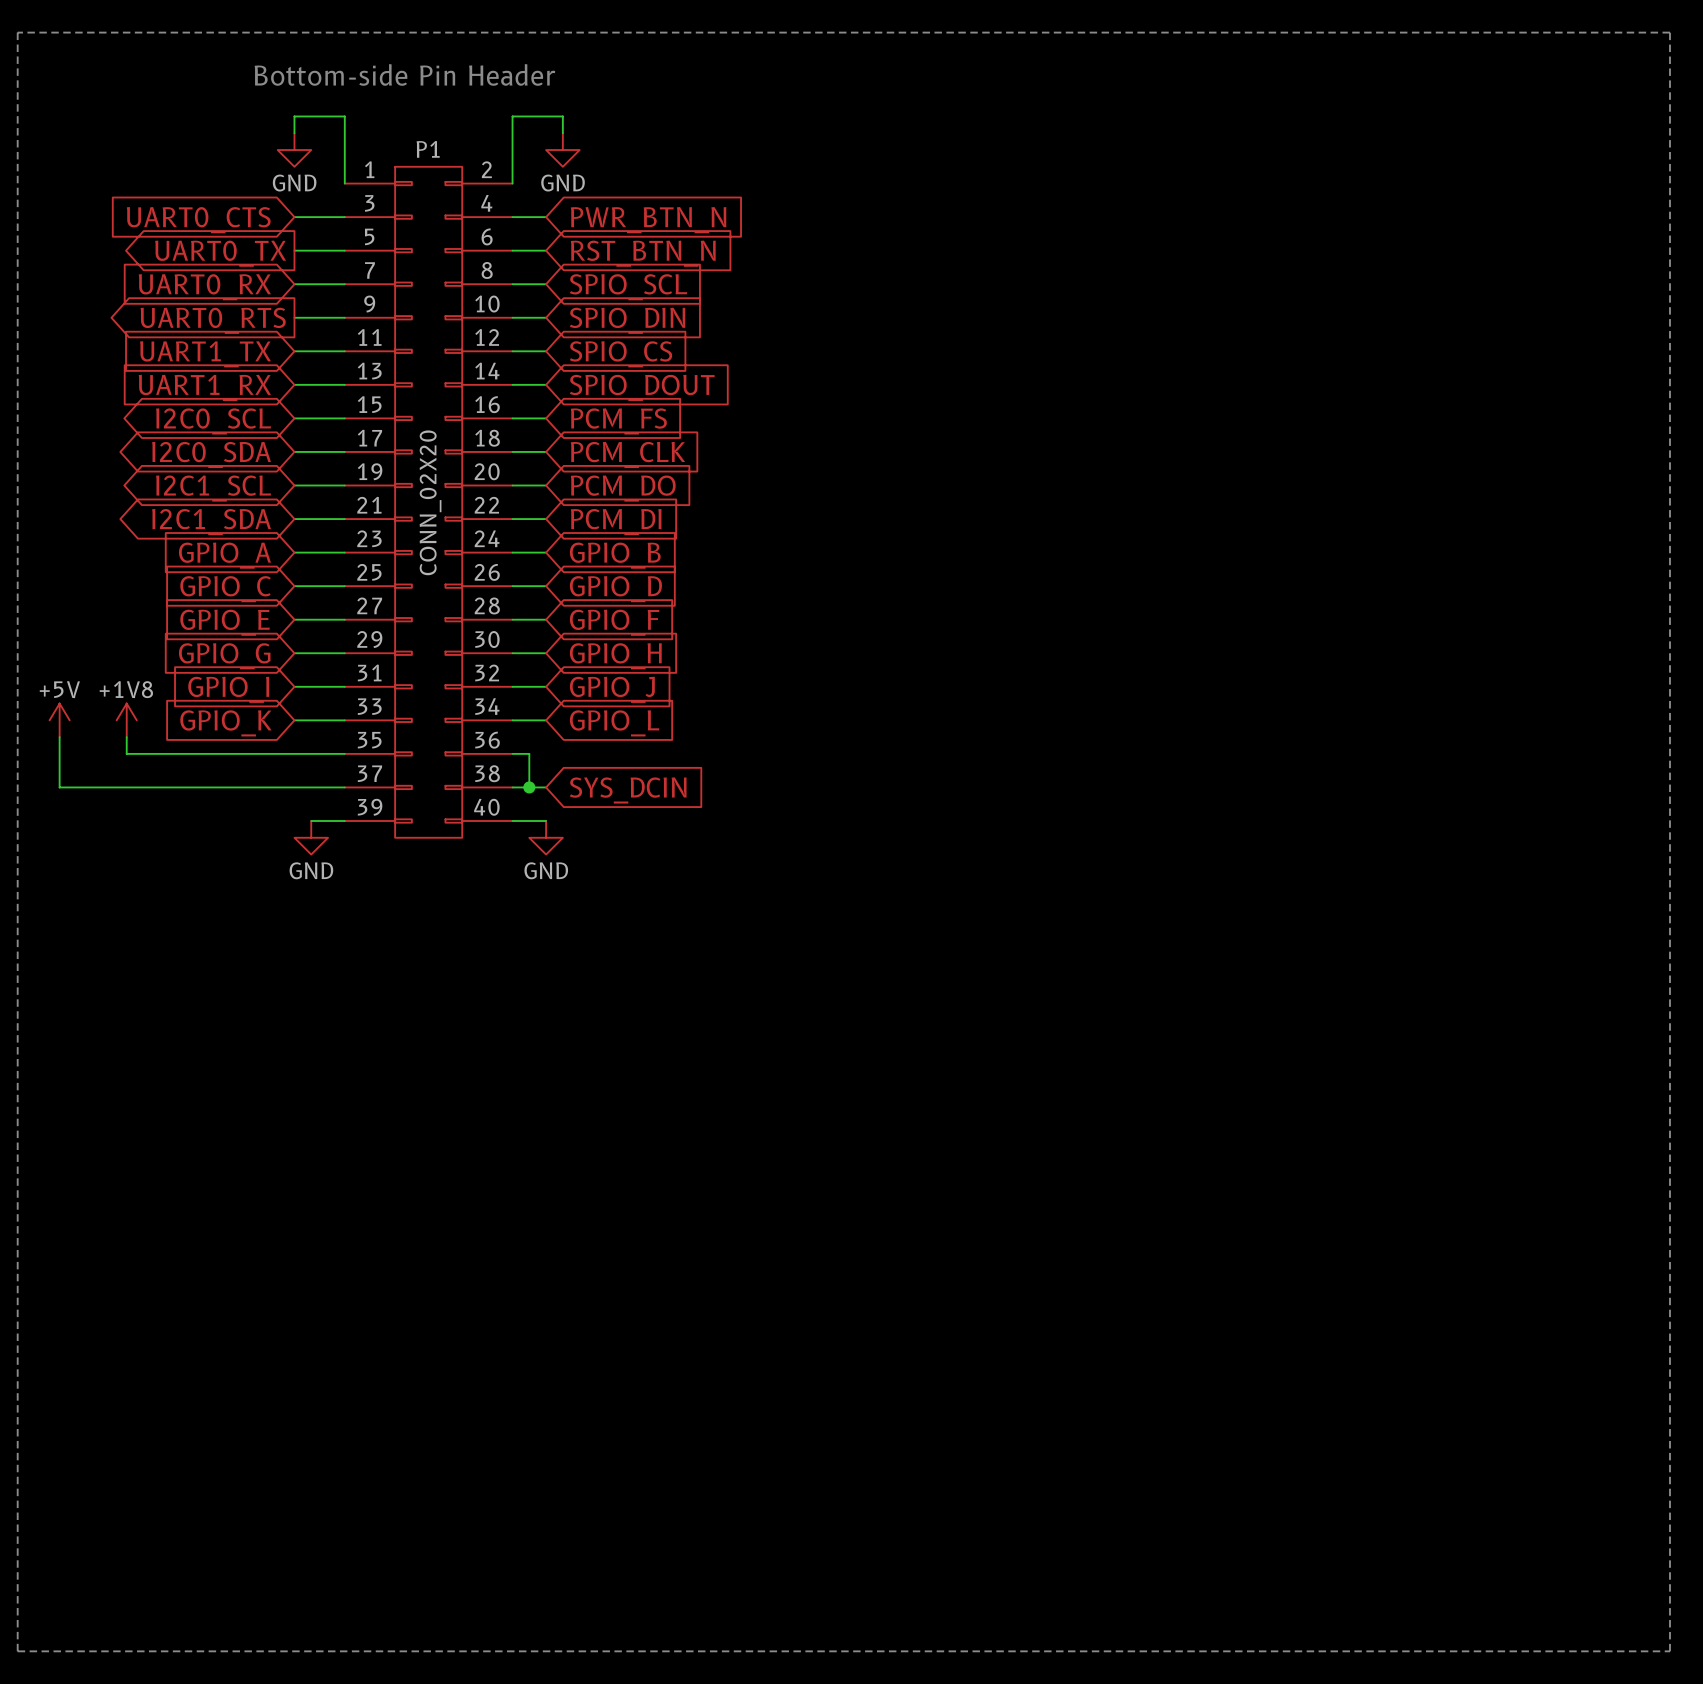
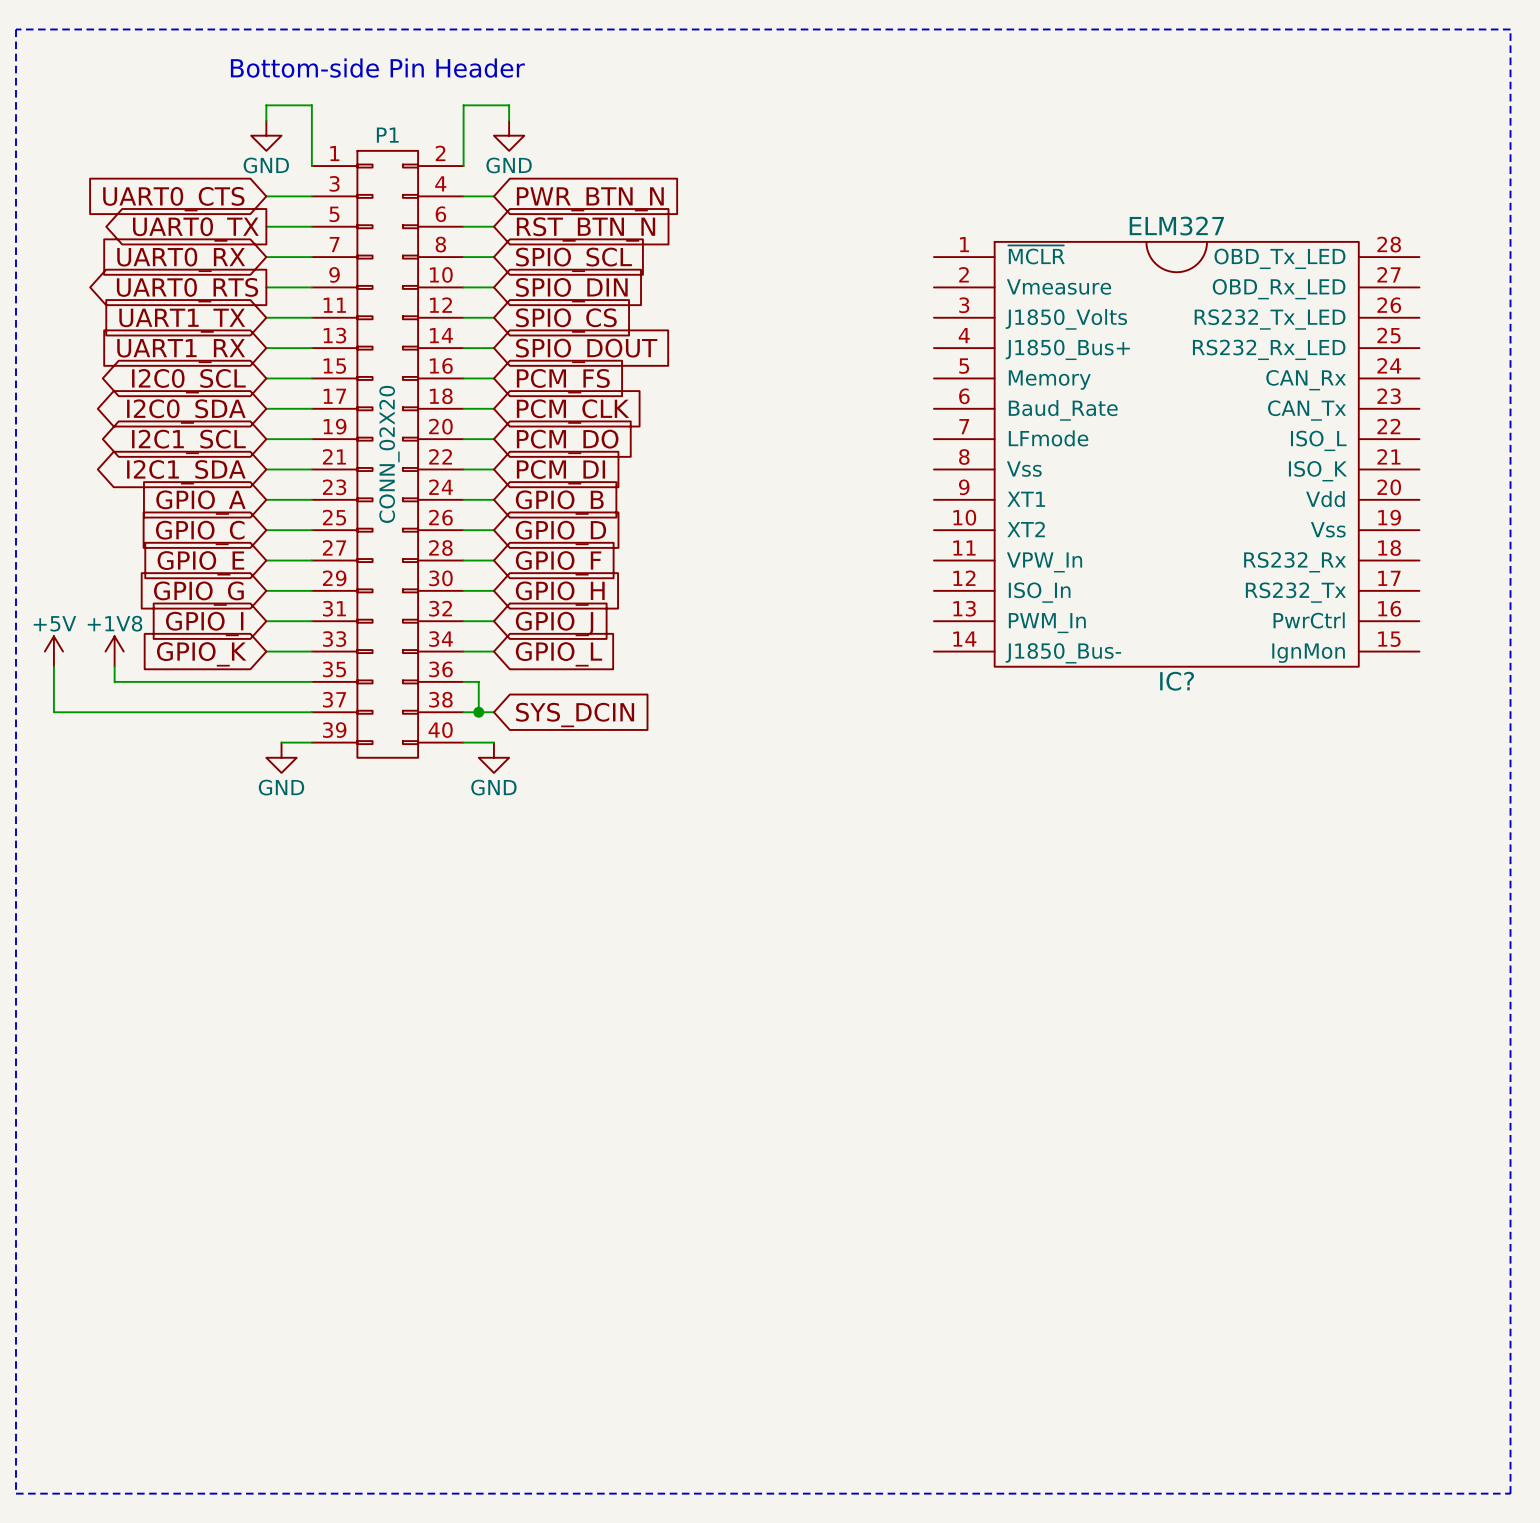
IC?: none -> ELM327 (1176, 454)

